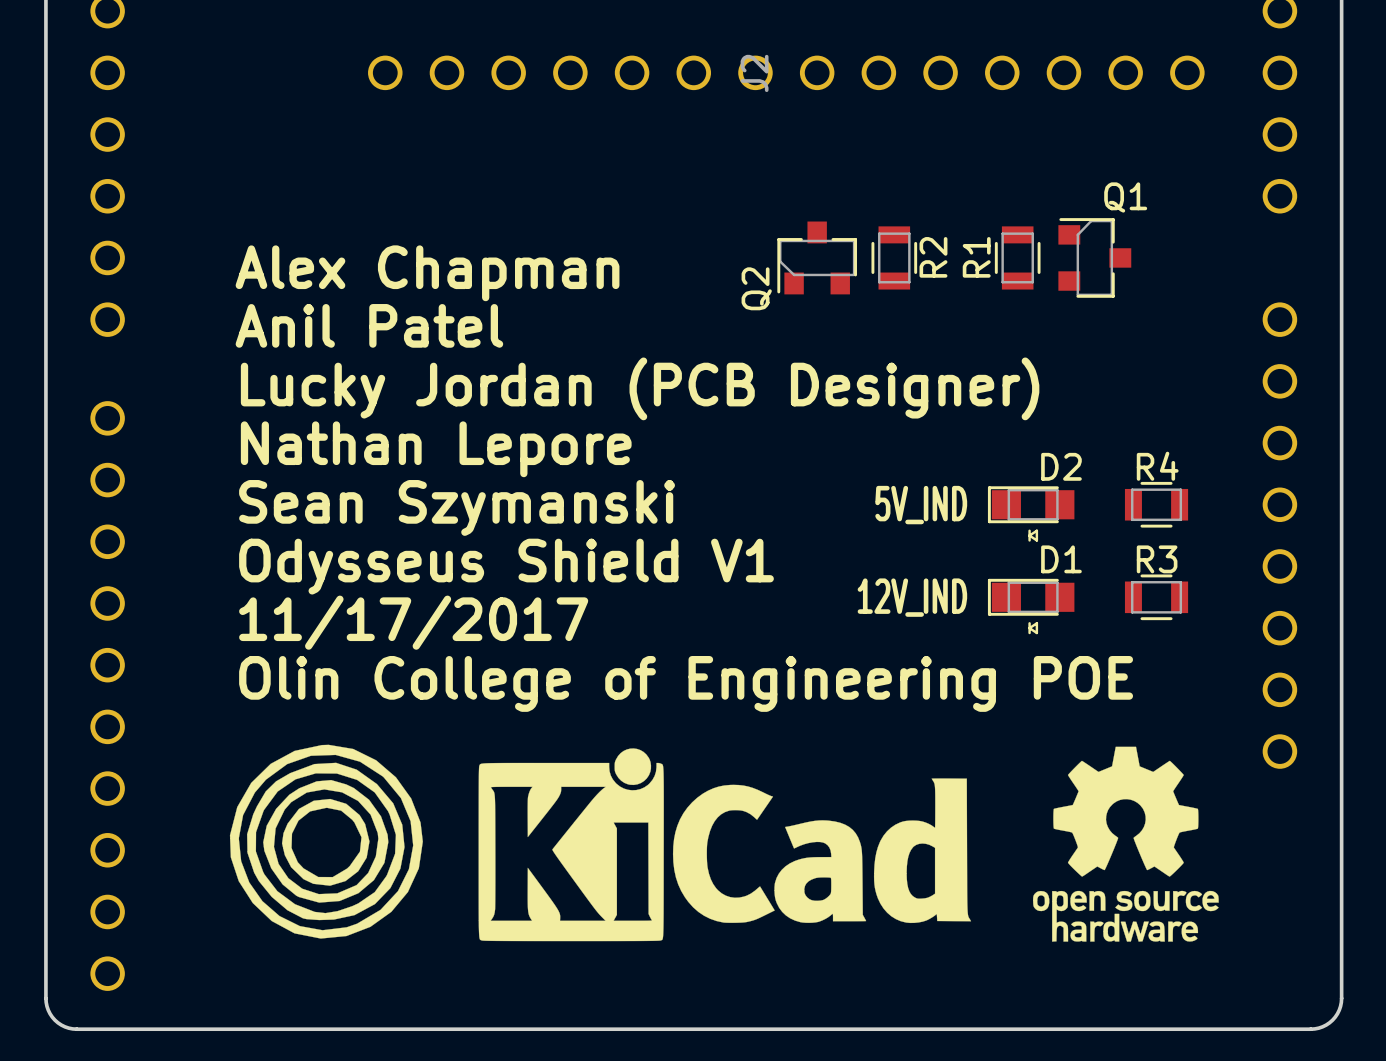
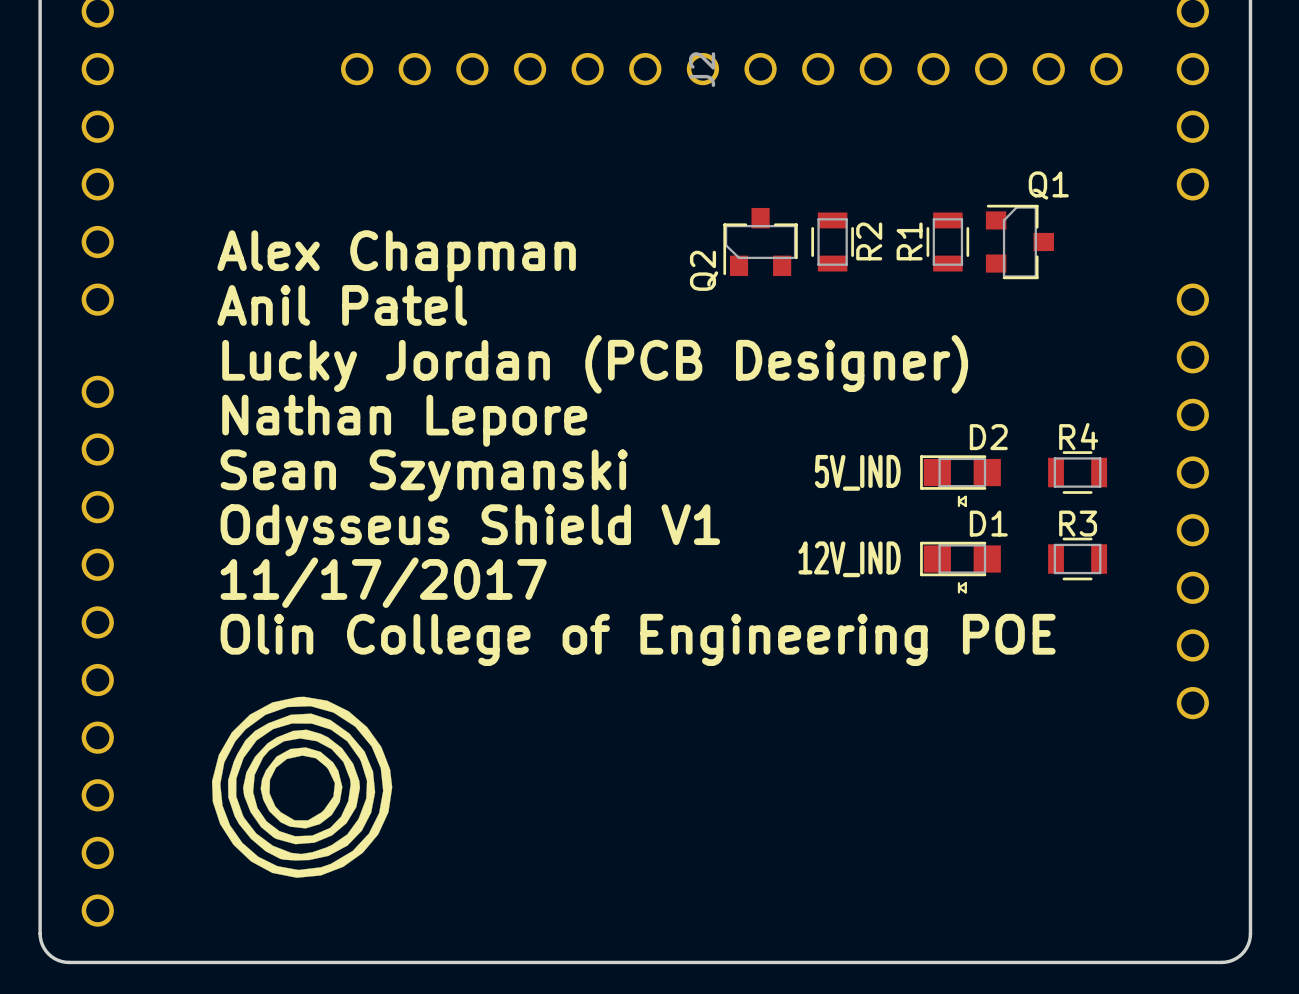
drawing: [1033, 746, 1219, 942] -> none
drawing: [478, 748, 972, 942] -> none

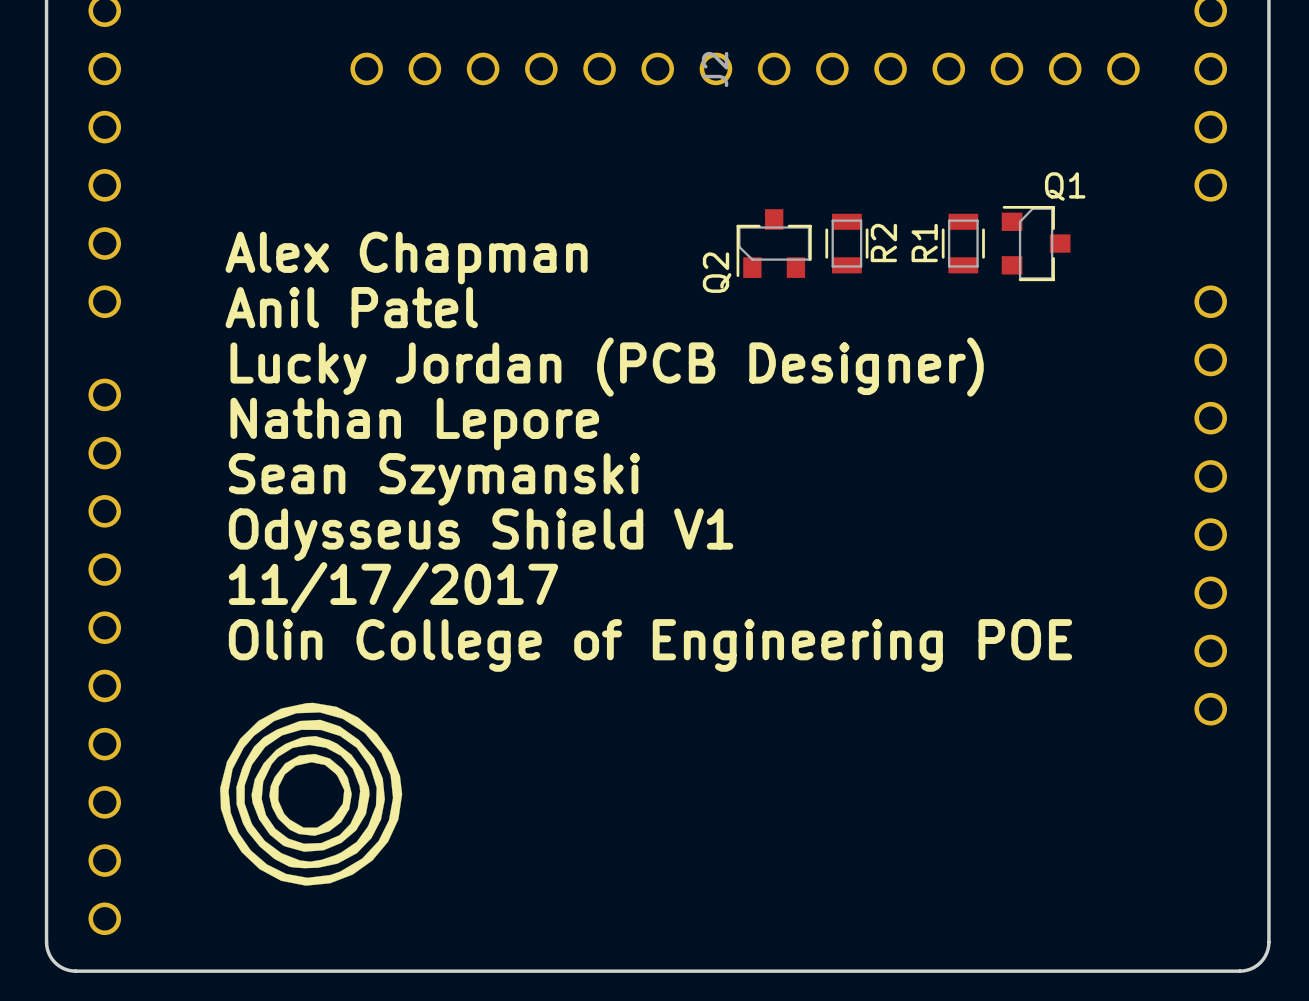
text: 5V_IND (857, 472) -> none
R4: (1077, 472) -> none
D2: (960, 481) -> none
R3: (1077, 558) -> none
text: 12V_IND (849, 559) -> none
D1: (960, 567) -> none

